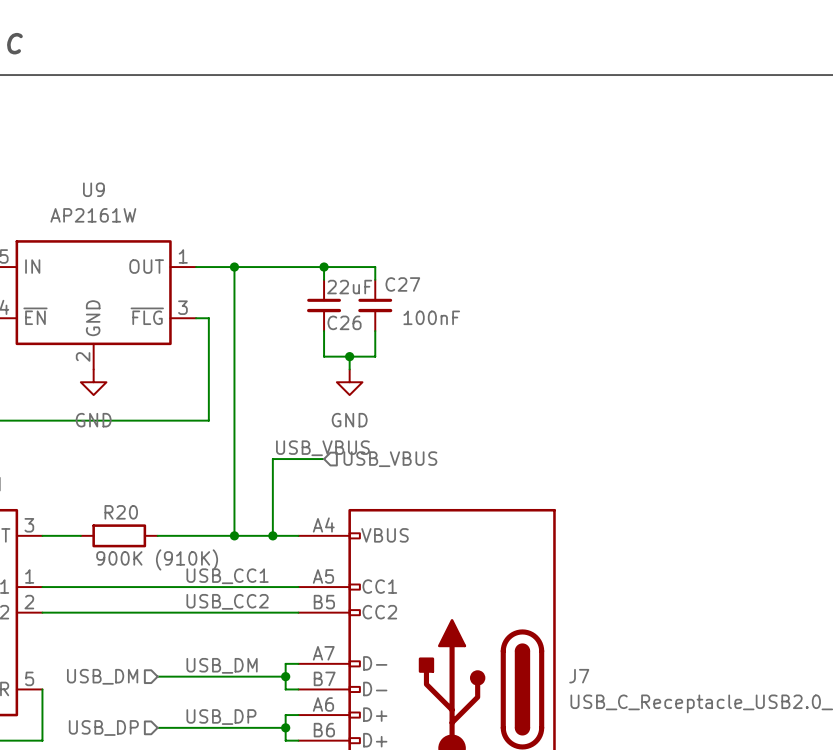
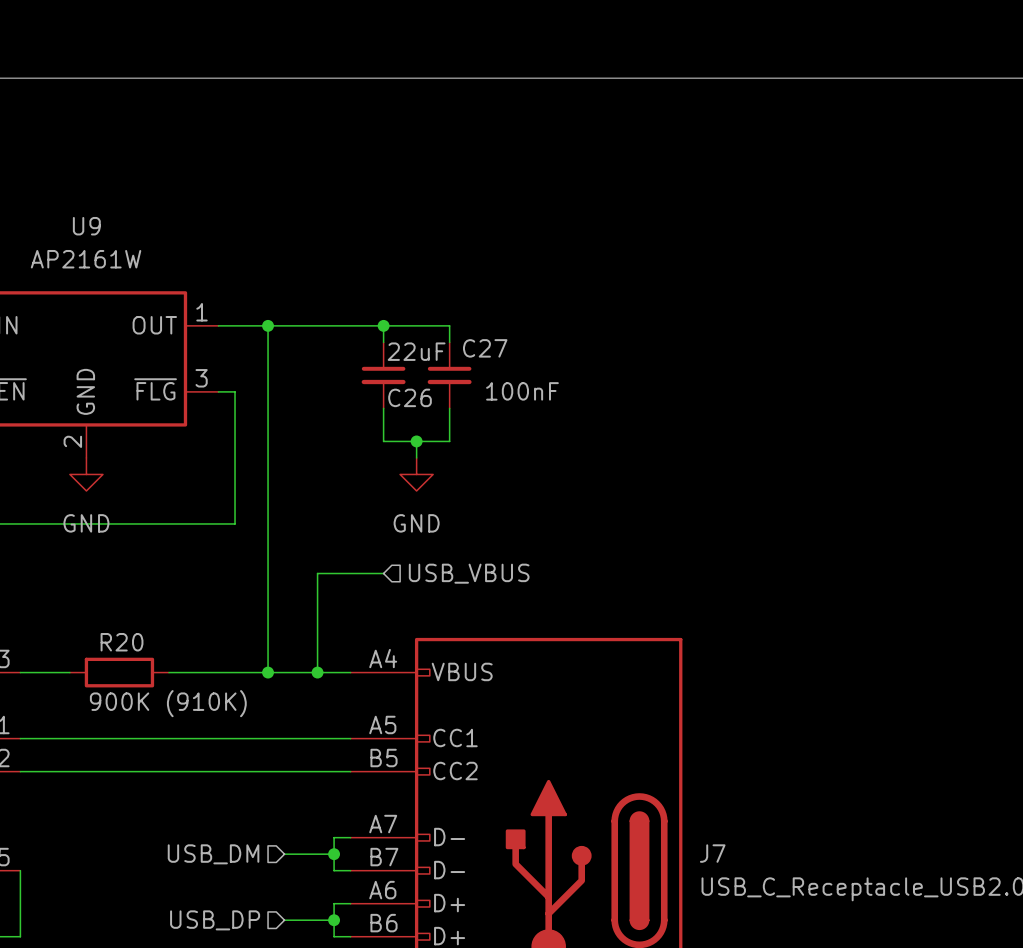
label: USB_VBUS (322, 448) -> none
label: USB_CC1 (227, 576) -> none
label: USB_CC2 (227, 601) -> none
label: USB_DM (222, 665) -> none
hierarchical label position: USB_DM (102, 676) -> USB_DM (213, 854)
wire: (157, 676) (247, 676) -> none
label: USB_DP (221, 717) -> none
hierarchical label position: USB_DP (103, 727) -> USB_DP (215, 920)
wire: (157, 727) (247, 727) -> none

